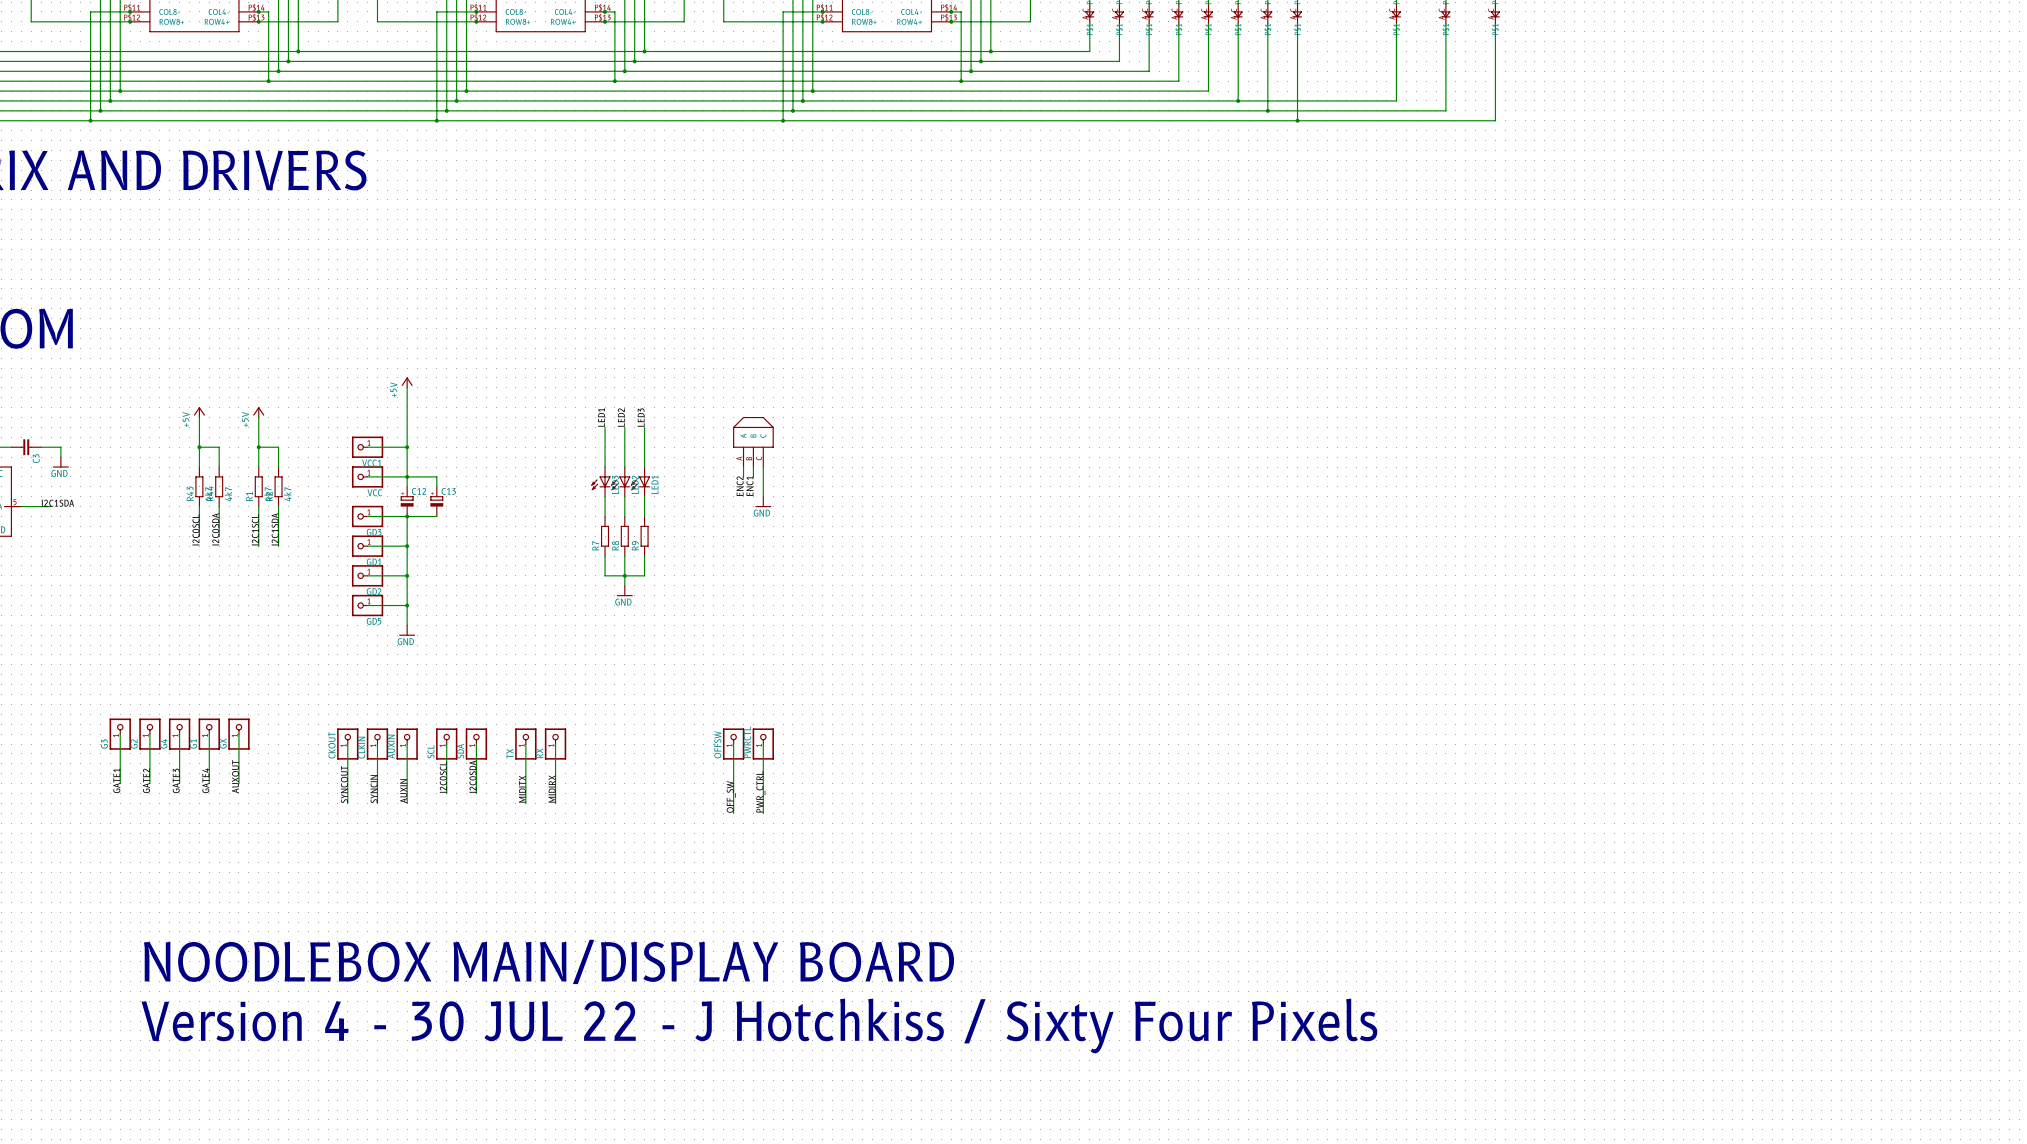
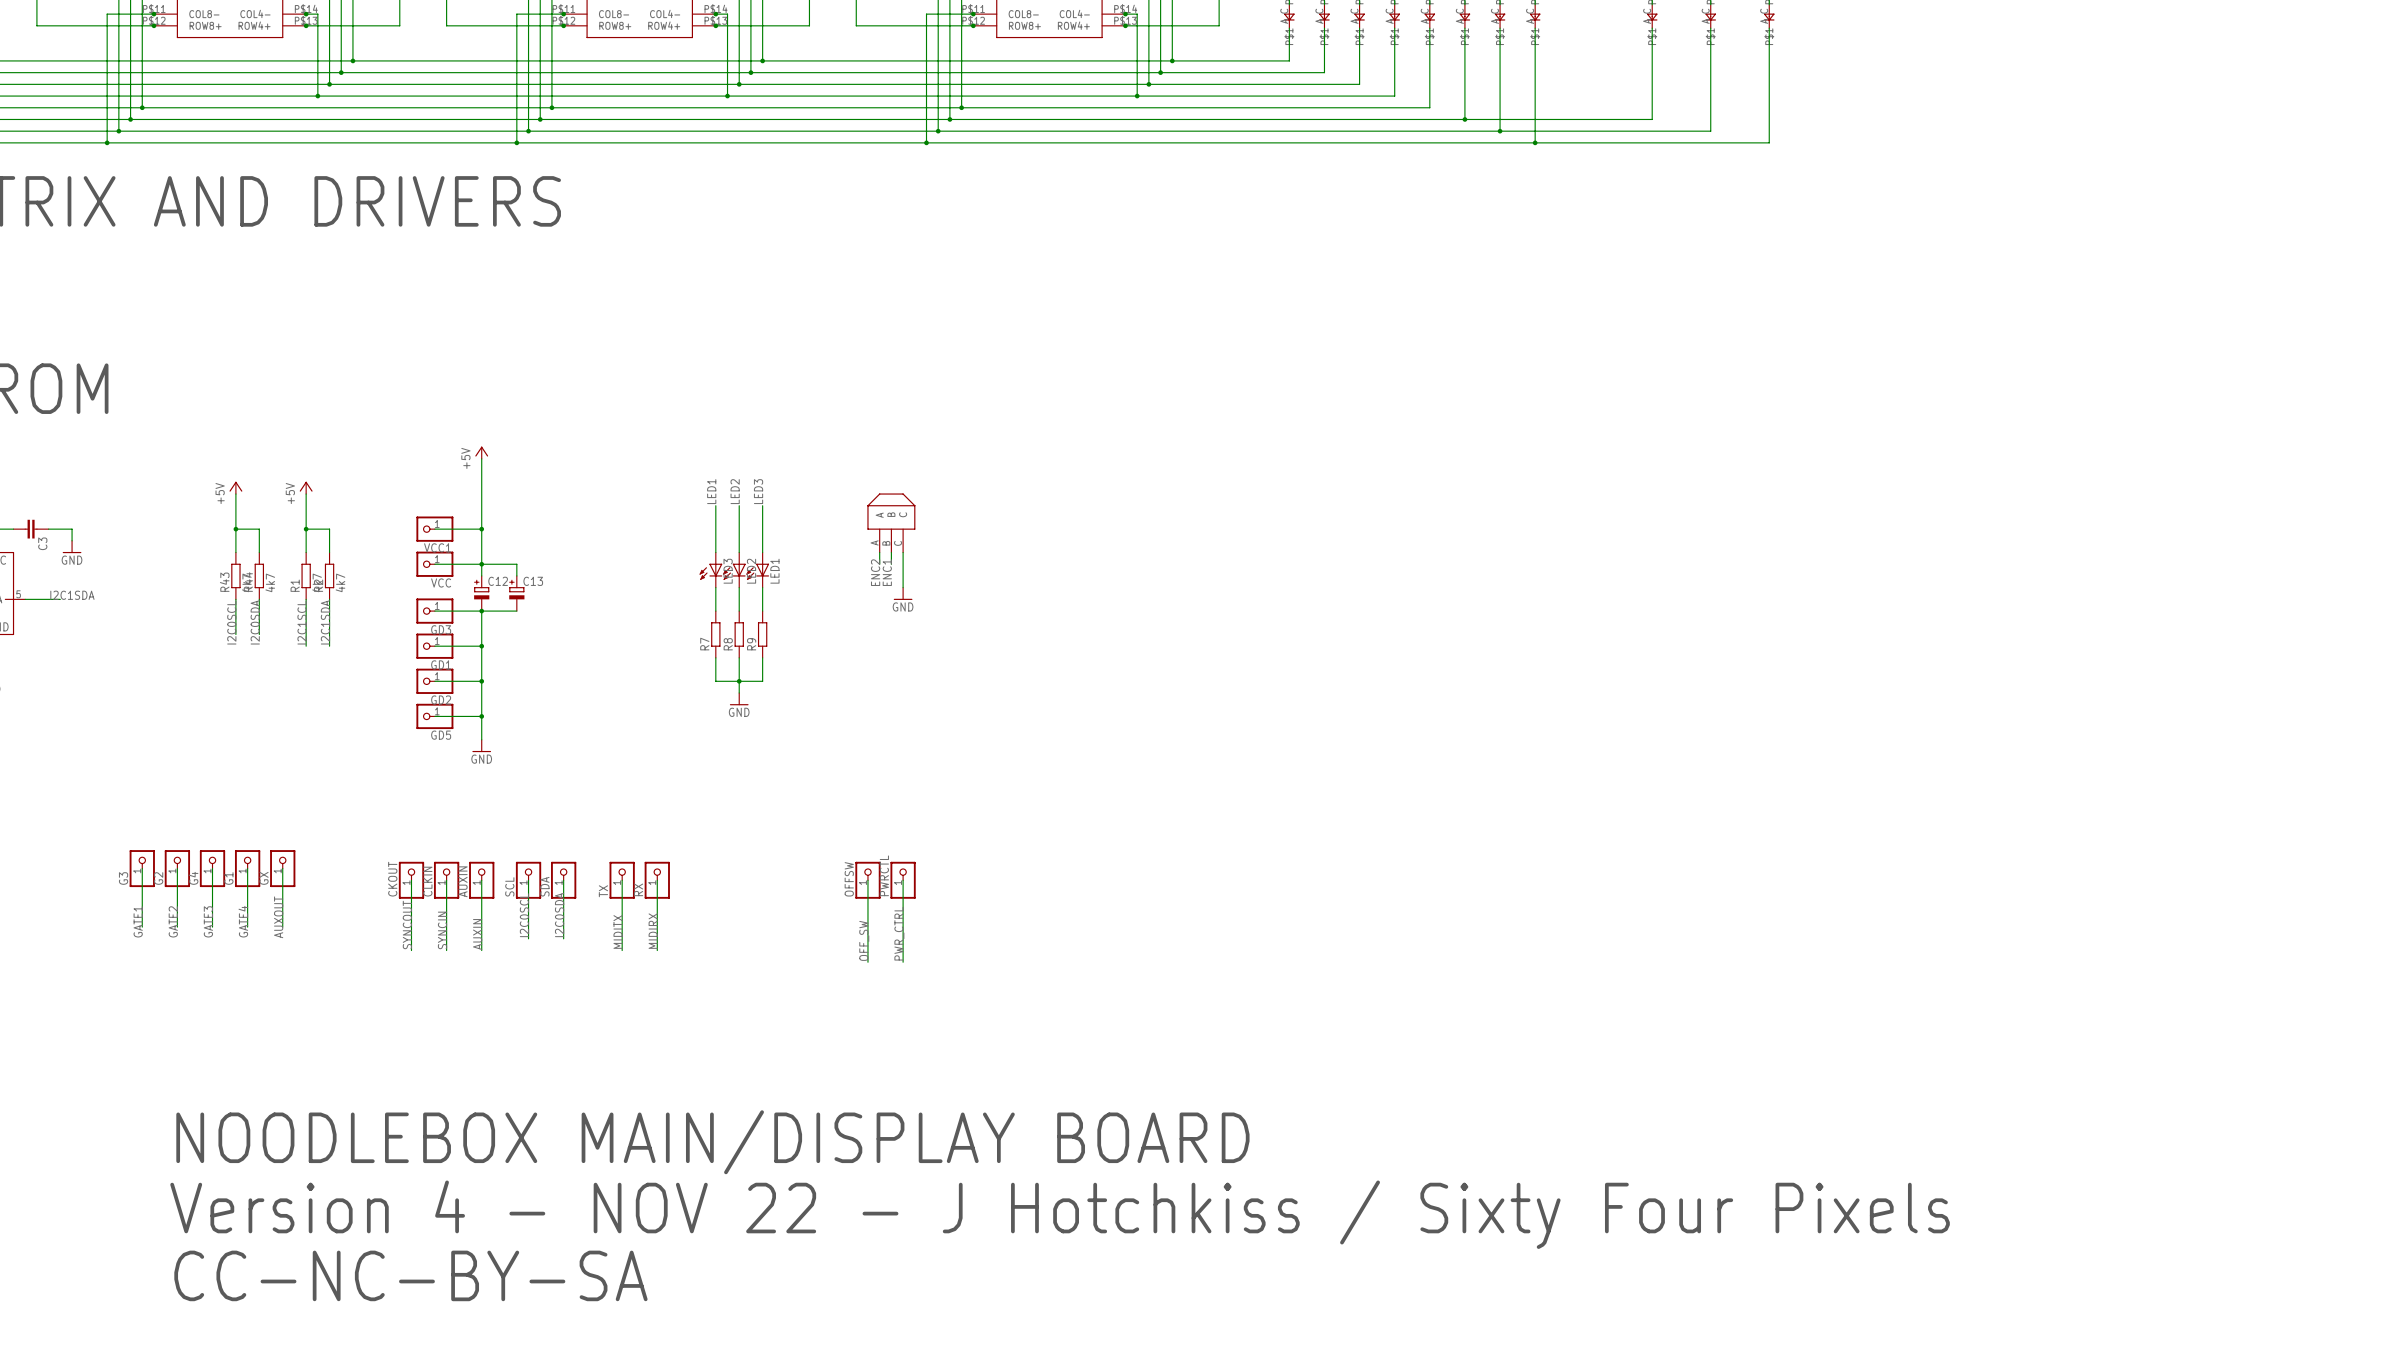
text: Version 4 - 30 JUL 22 - J Hotchkiss / Sixty Four Pixels (759, 1025) -> Version 4 - NOV 22 - J Hotchkiss / Sixty Four Pixels (1060, 1214)
text: none -> CC-NC-BY-SA (410, 1275)

